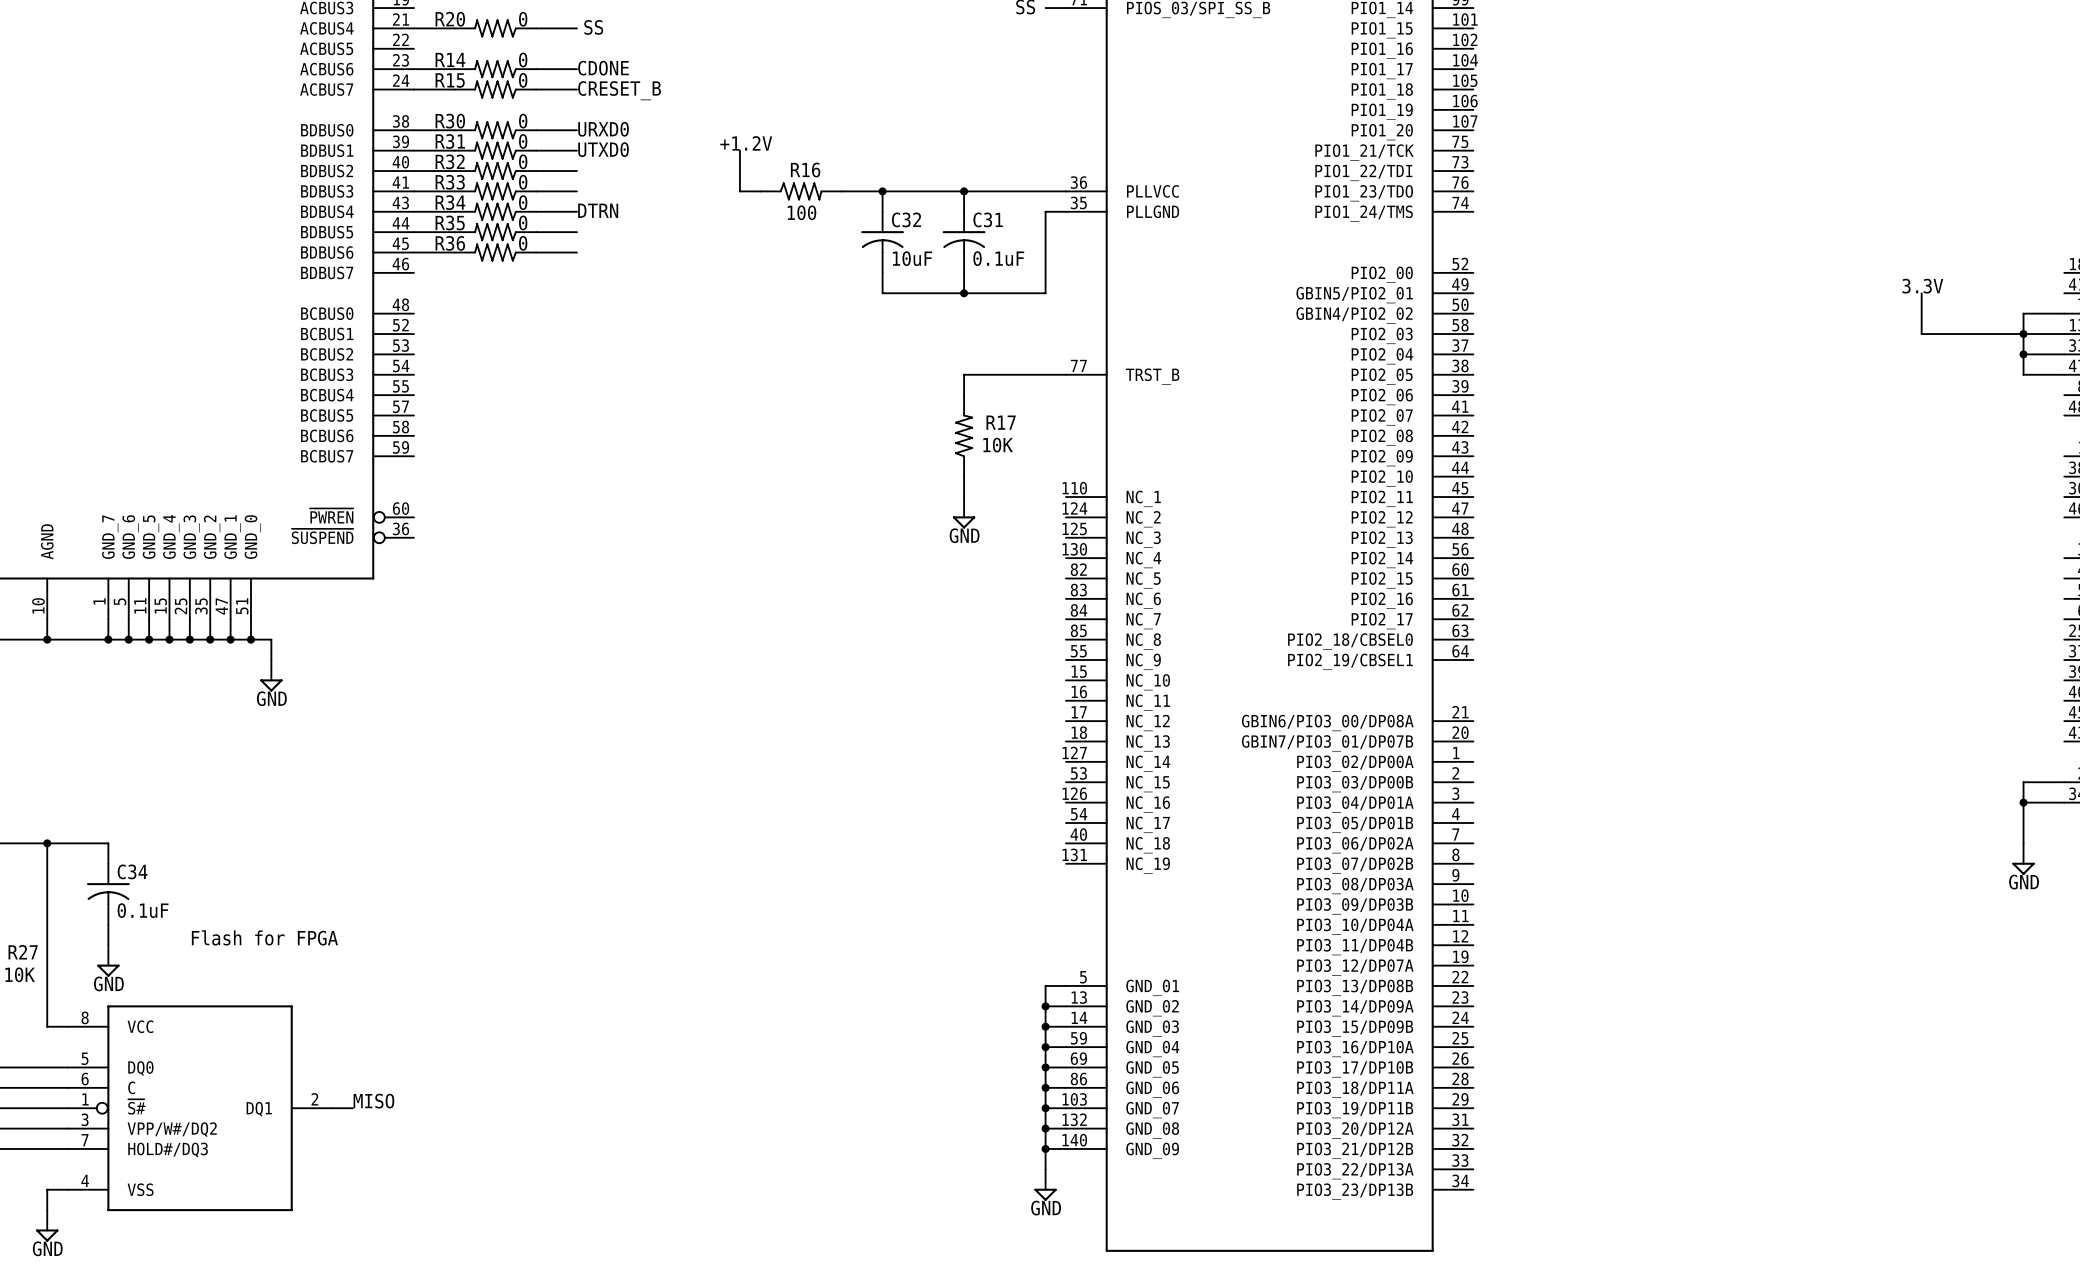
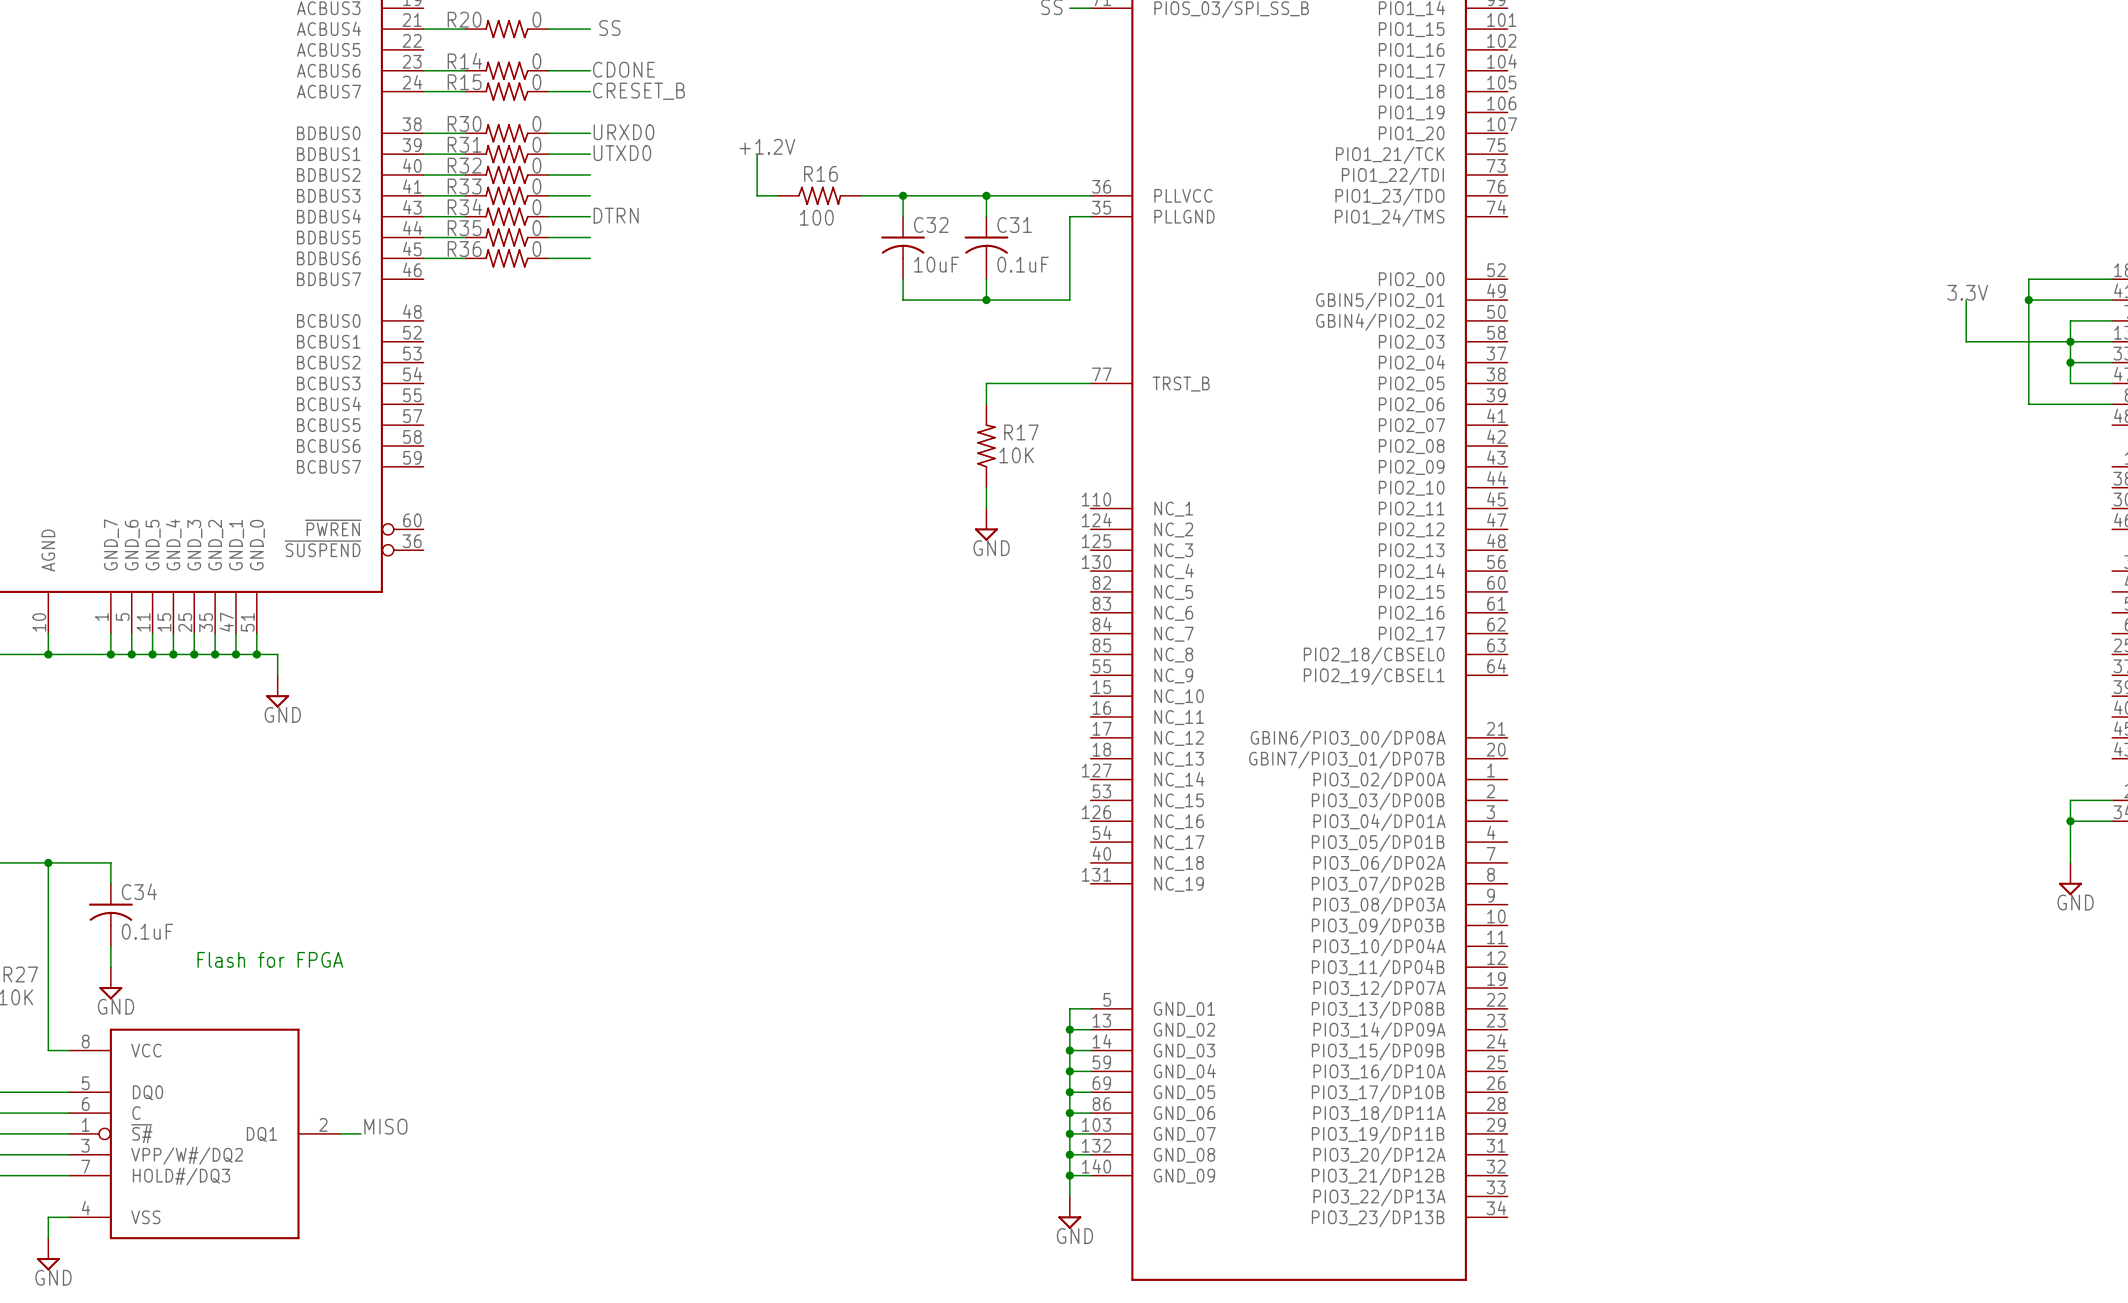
wire: none -> (2112, 279) (2028, 279) (2028, 404) (2112, 404)
wire: none -> (2028, 300) (2112, 300)
junction: none -> (2028, 300)

